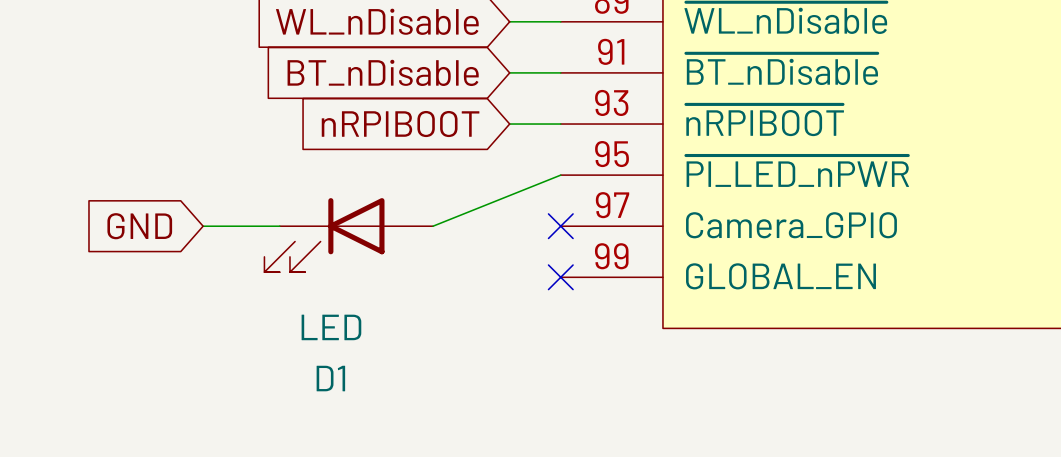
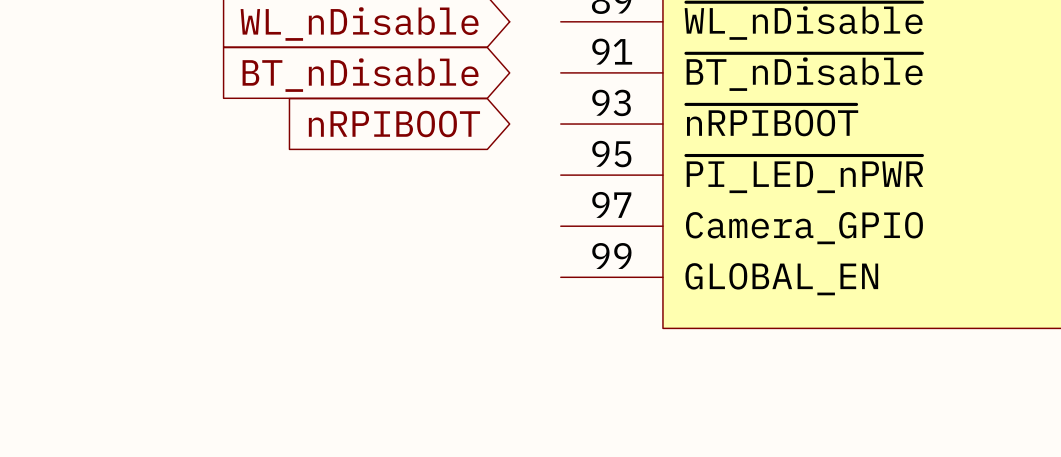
wire: (509, 21) (560, 21) -> none
wire: (509, 72) (560, 72) -> none
wire: (509, 124) (560, 124) -> none
wire: (560, 175) (433, 226) -> none
global label: GND (139, 226) -> none
wire: (203, 226) (279, 226) -> none
no-connect mark: (560, 226) -> none
D1: LED (348, 235) -> none
no-connect mark: (560, 277) -> none

